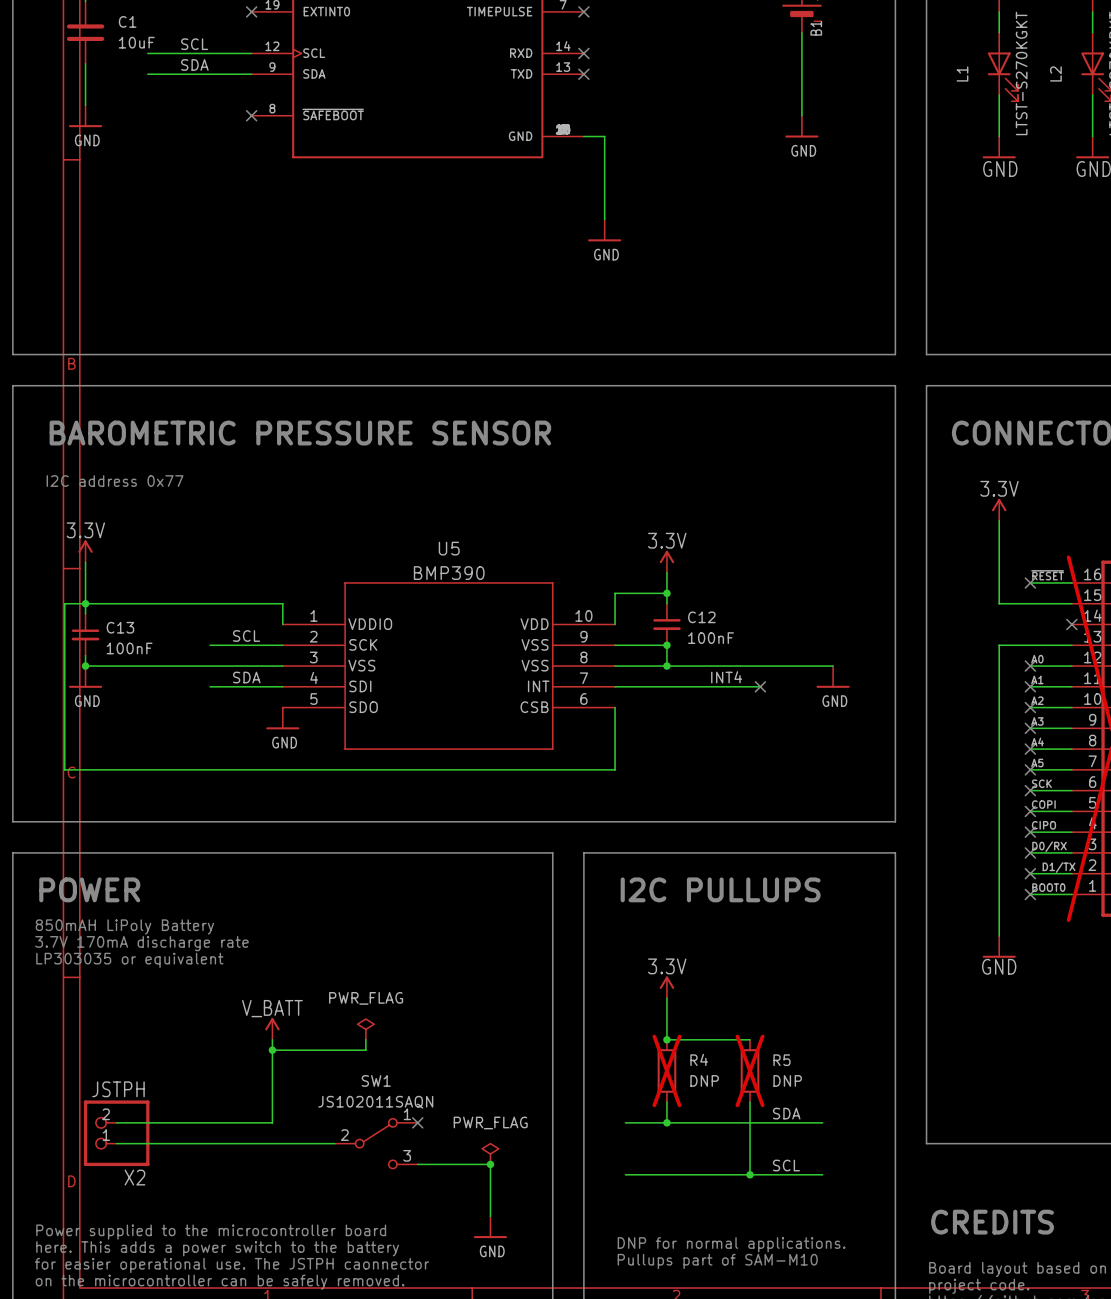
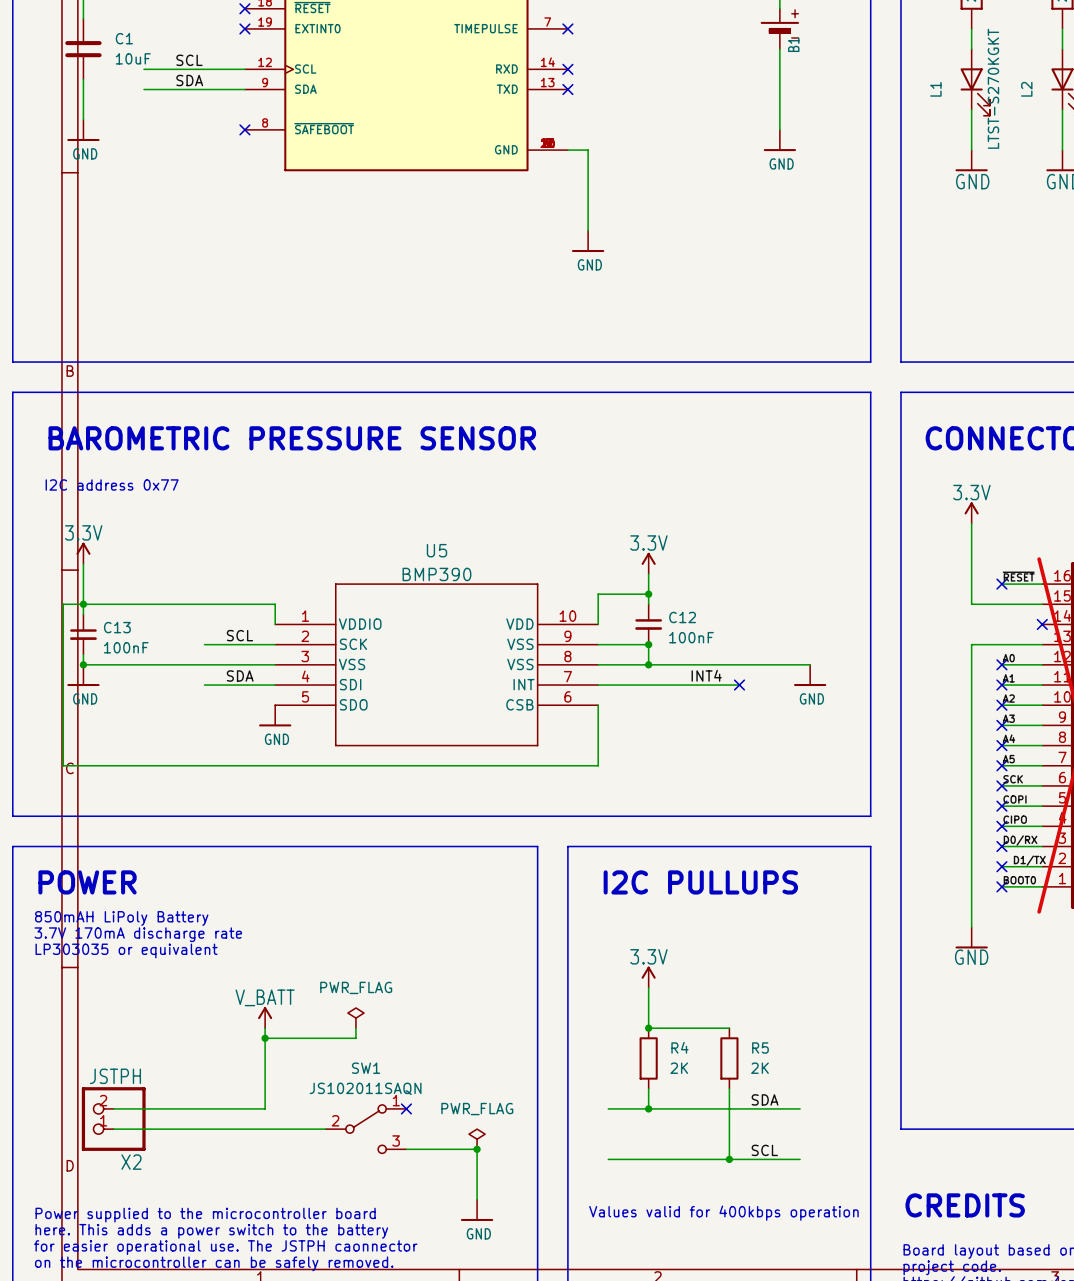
R4 do-not-place cross: (666, 1070) -> none
R5 do-not-place cross: (750, 1070) -> none
R4 value: DNP (704, 1080) -> 2K (679, 1068)
R5 value: DNP (787, 1080) -> 2K (760, 1068)
text: none -> Values valid for 400kbps operation (723, 1213)
text: DNP for normal applications. (731, 1244) -> none
text: Pullups part of SAM-M10 (717, 1261) -> none

